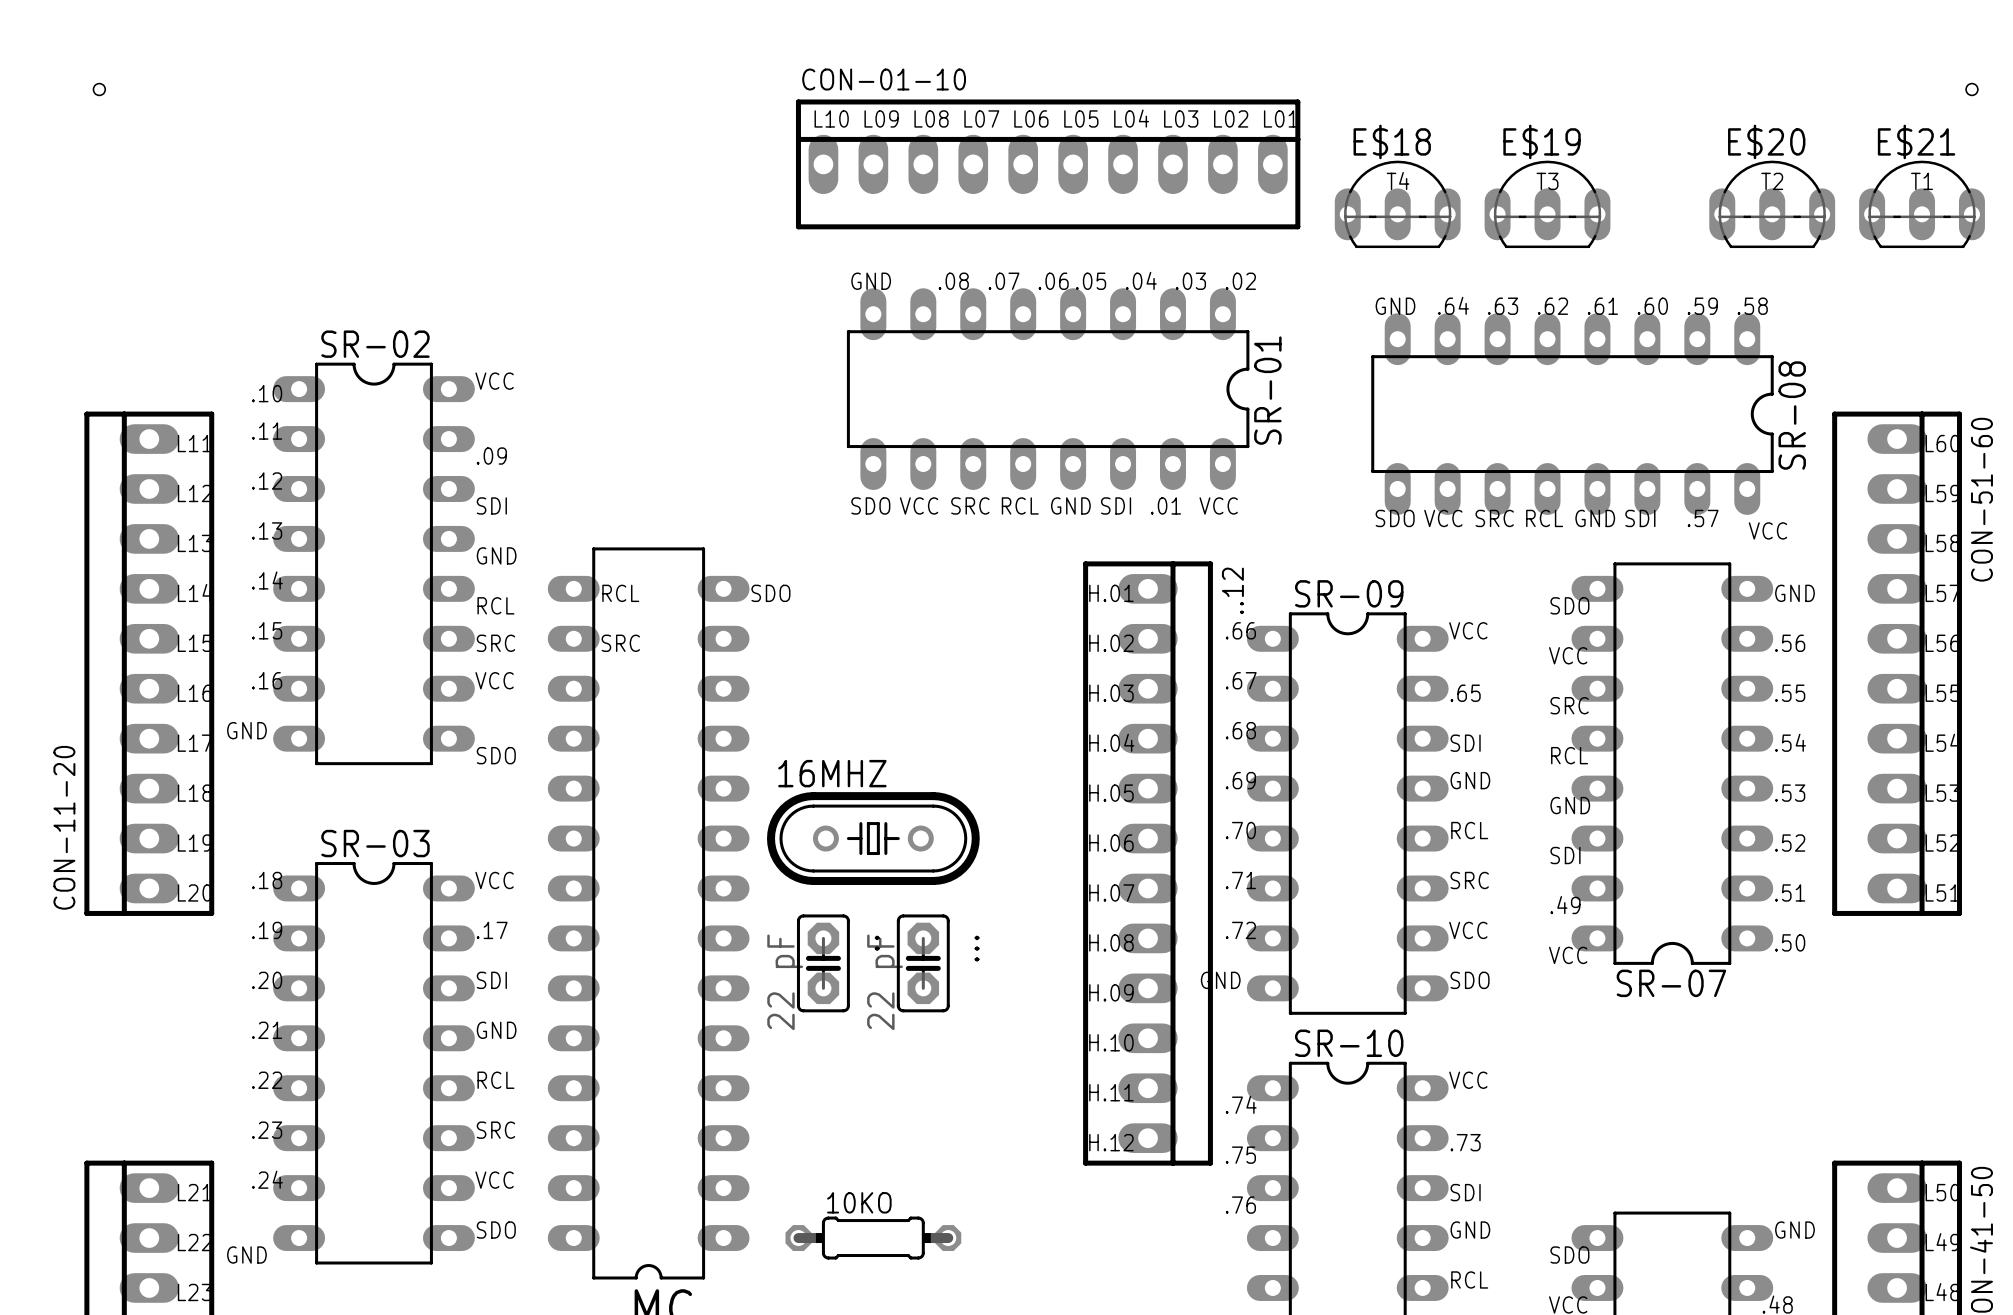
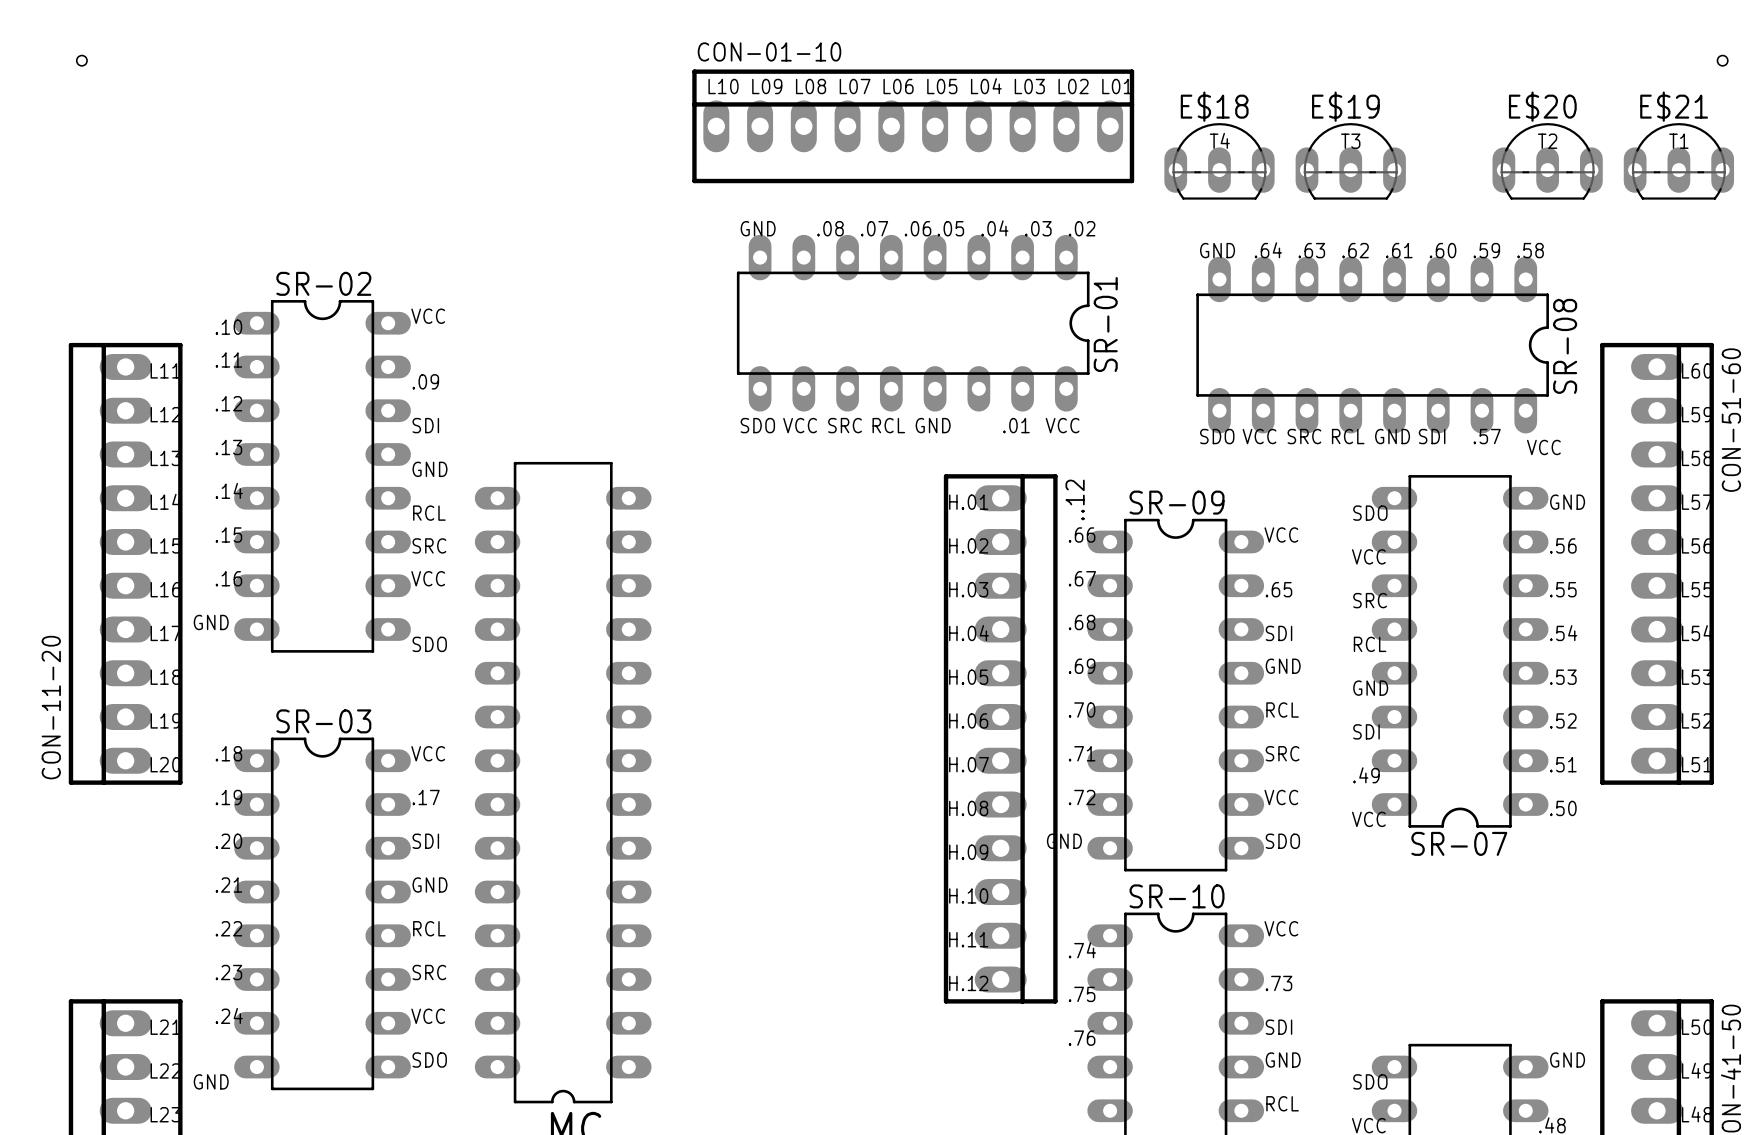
text: SDI (1116, 505) -> none
text: RCL (620, 593) -> none
text: SDO (770, 593) -> none
text: SRC (620, 643) -> none
16MHZ: (873, 838) -> none
part: 22 pF (823, 963) -> none
part: 22 pF (923, 963) -> none
10KO: (873, 1238) -> none

